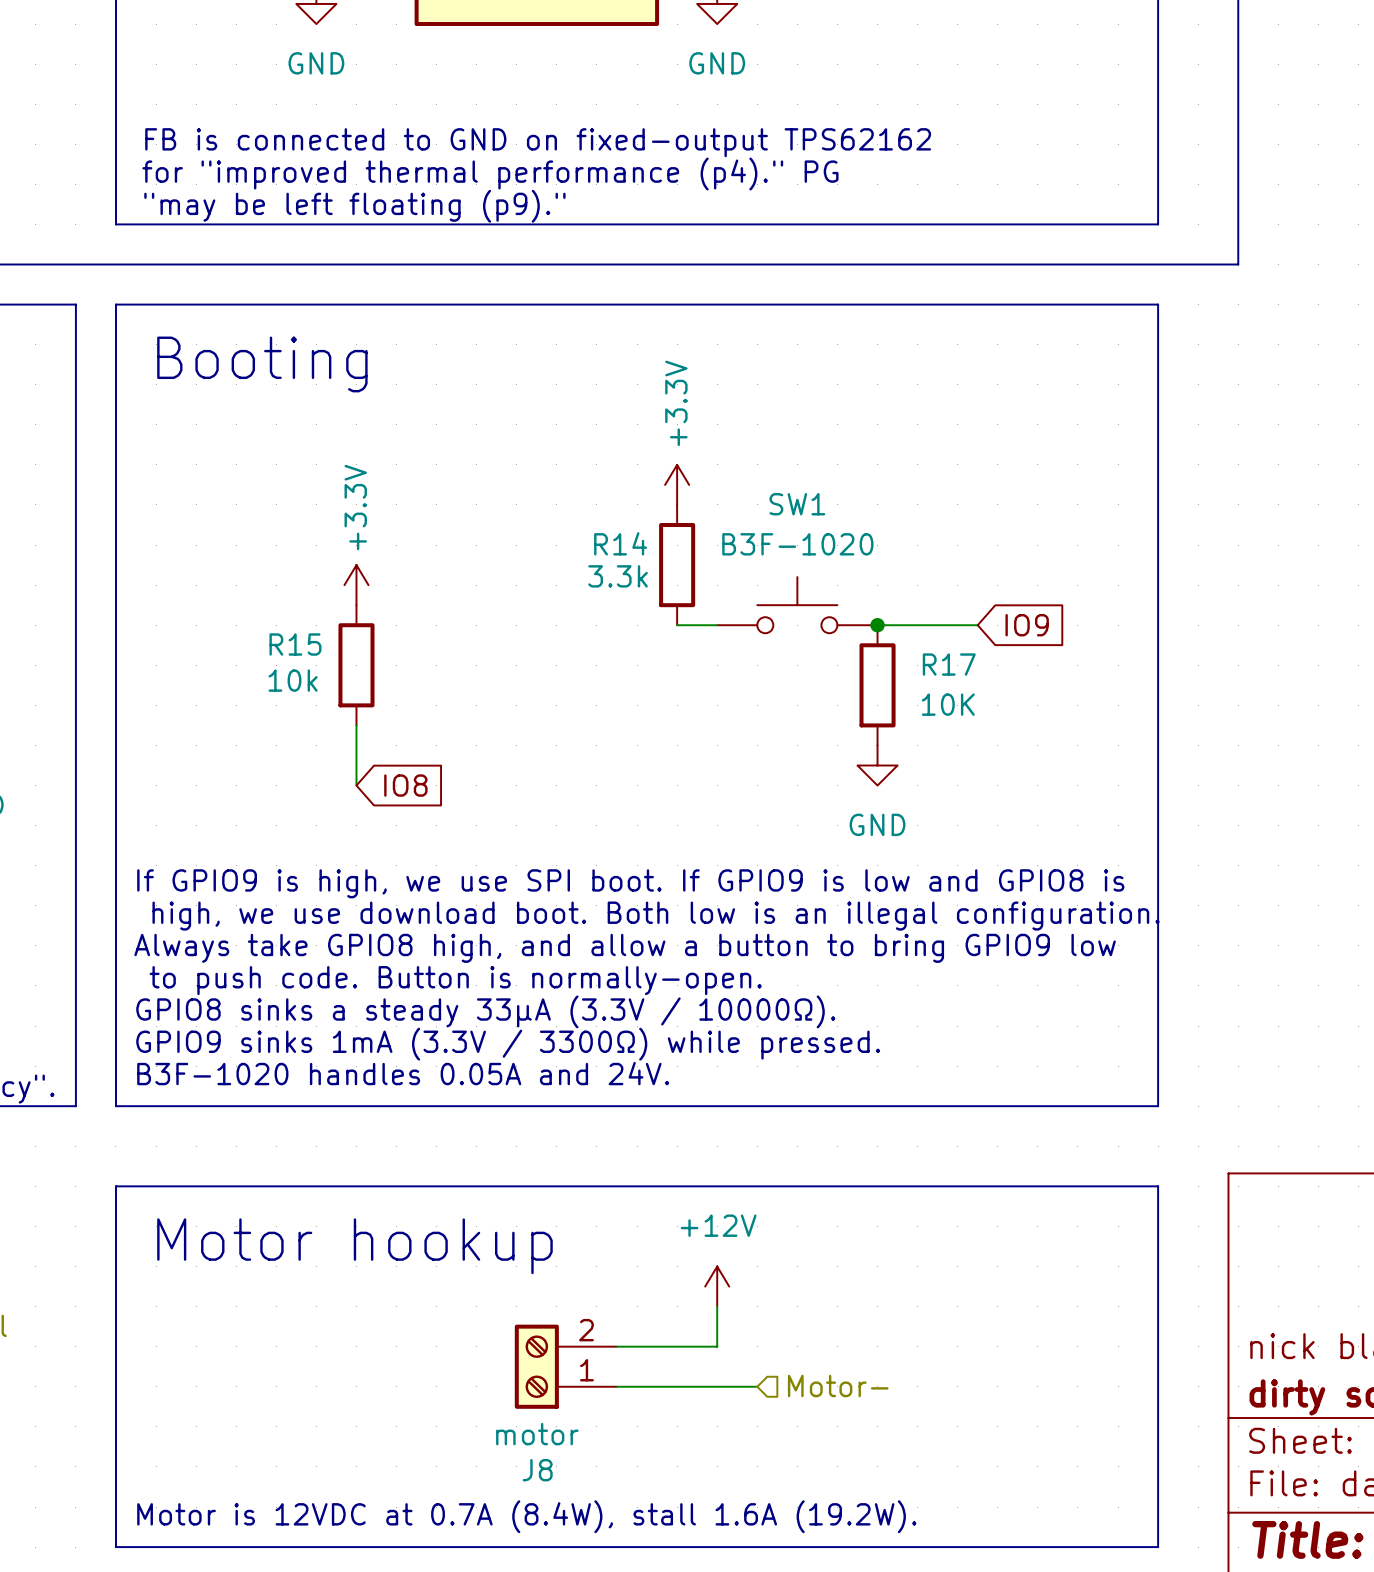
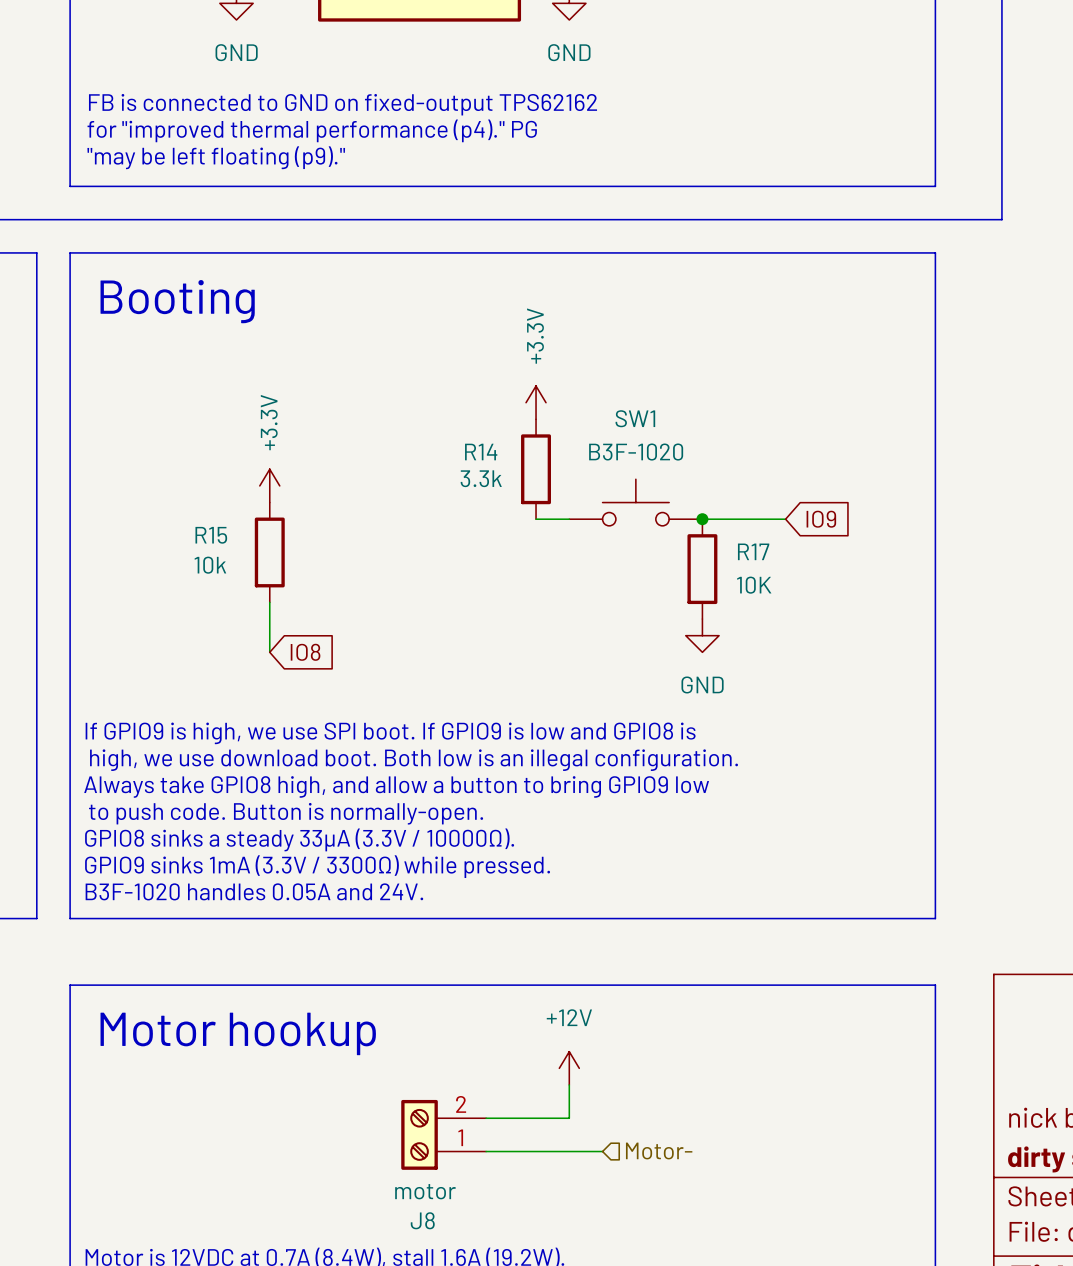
text position: FB is connected to GND on fixed-output TPS62162 (538, 142) -> FB is connected to GND on fixed-output TPS62162 (343, 104)
text position: for "improved thermal performance (p4)." PG (490, 174) -> for "improved thermal performance (p4)." PG (312, 130)
text position: "may be left floating (p9)." (354, 206) -> "may be left floating (p9)." (216, 157)

